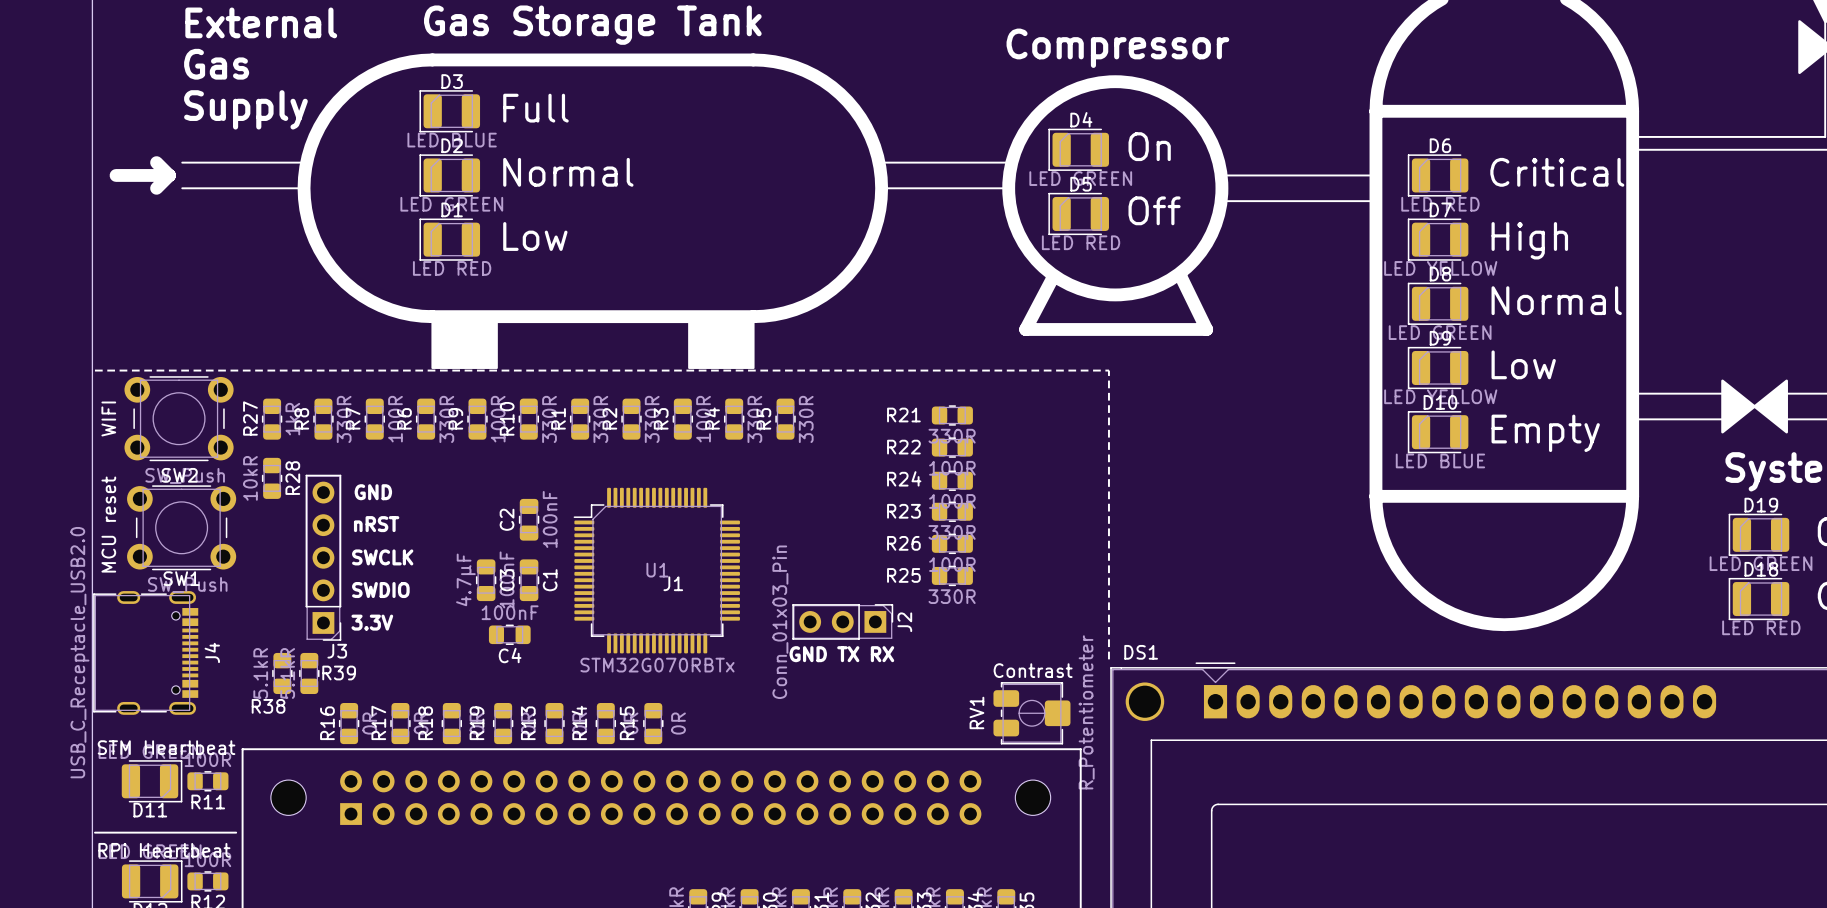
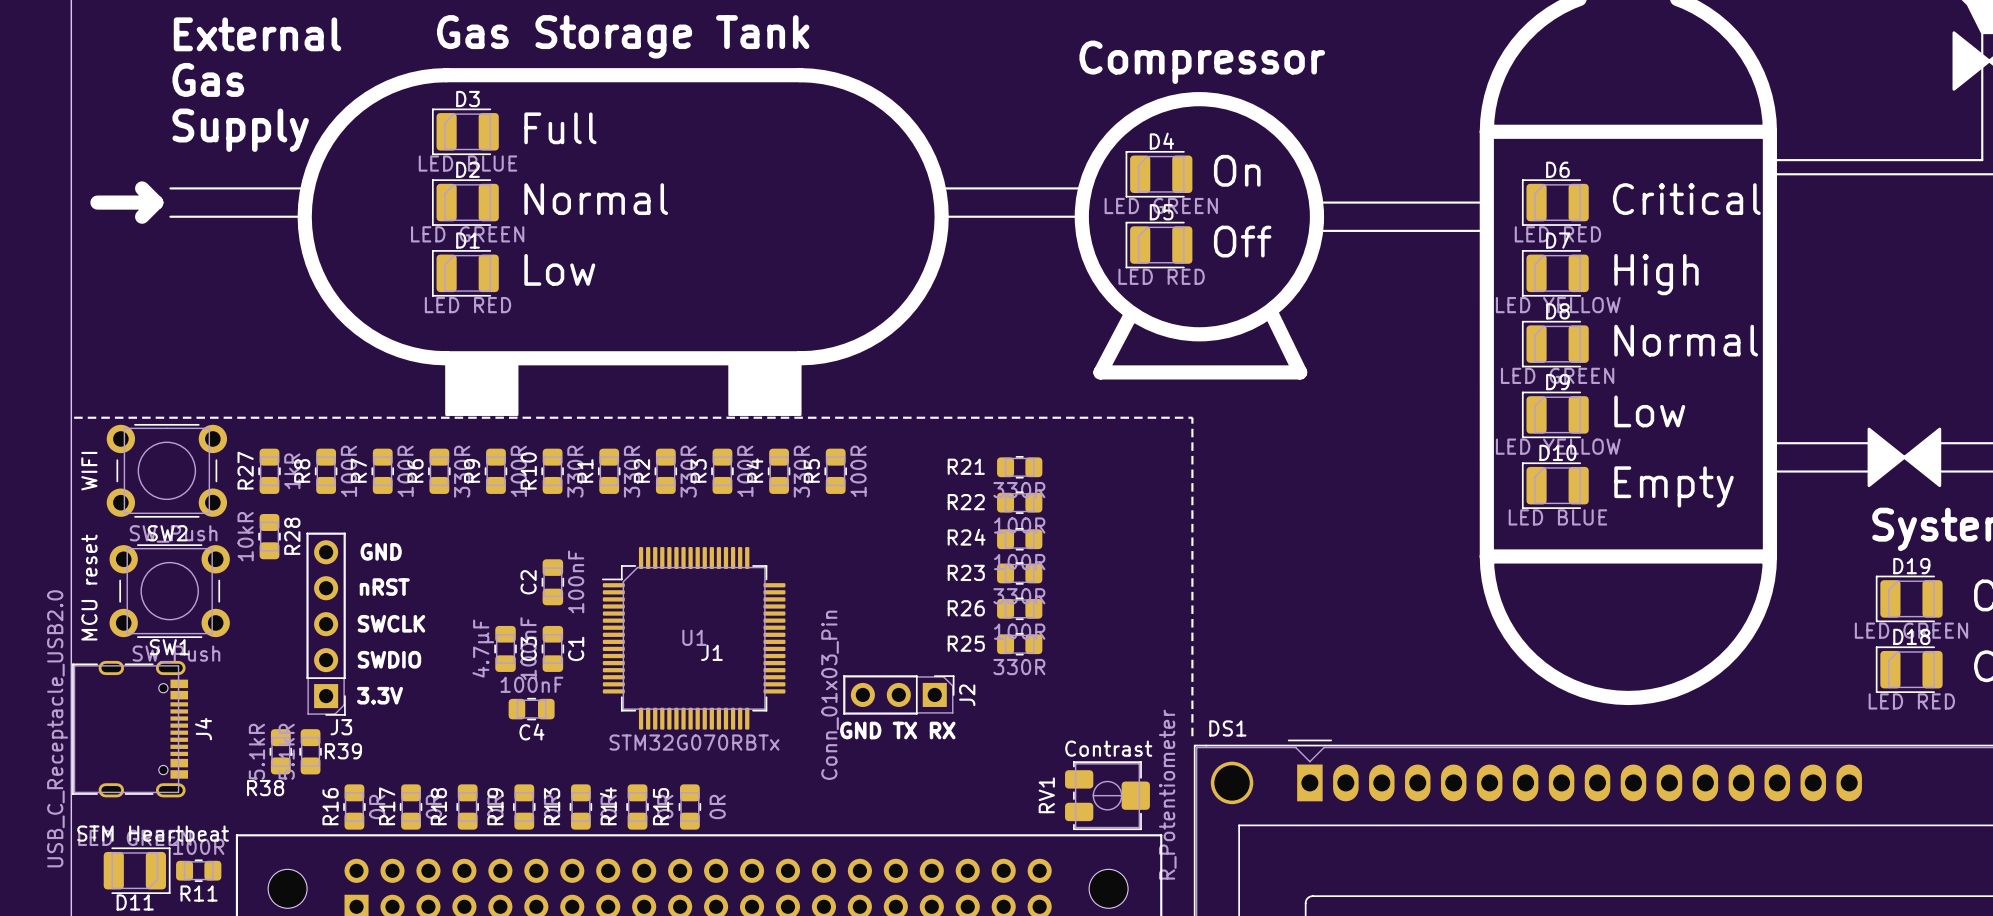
R8 value: 330R (344, 419) -> 100R (348, 471)
R5 value: 330R (806, 419) -> 100R (858, 471)

